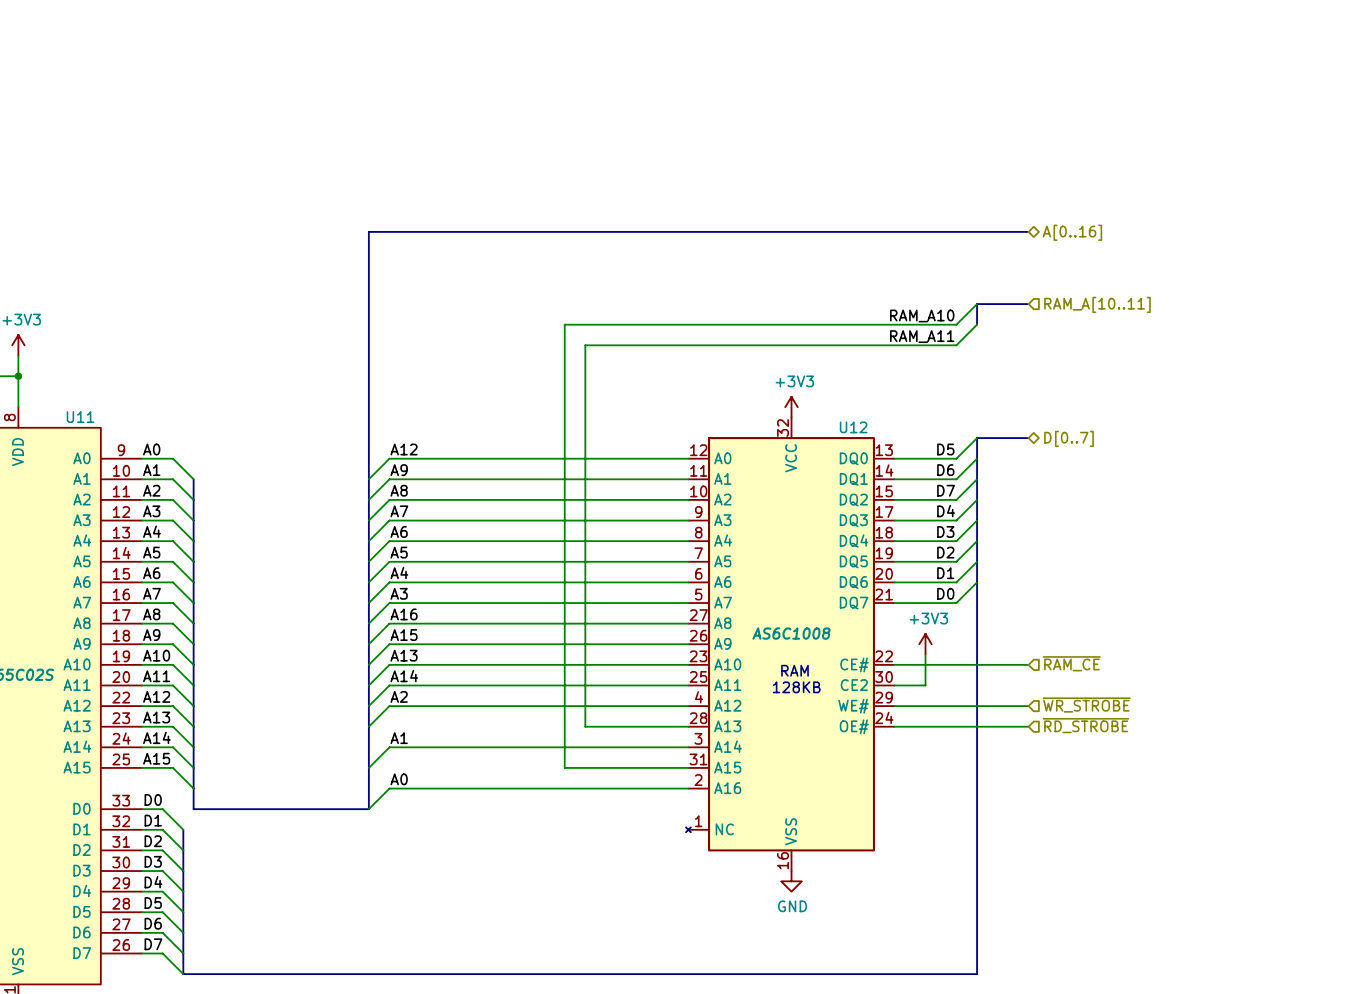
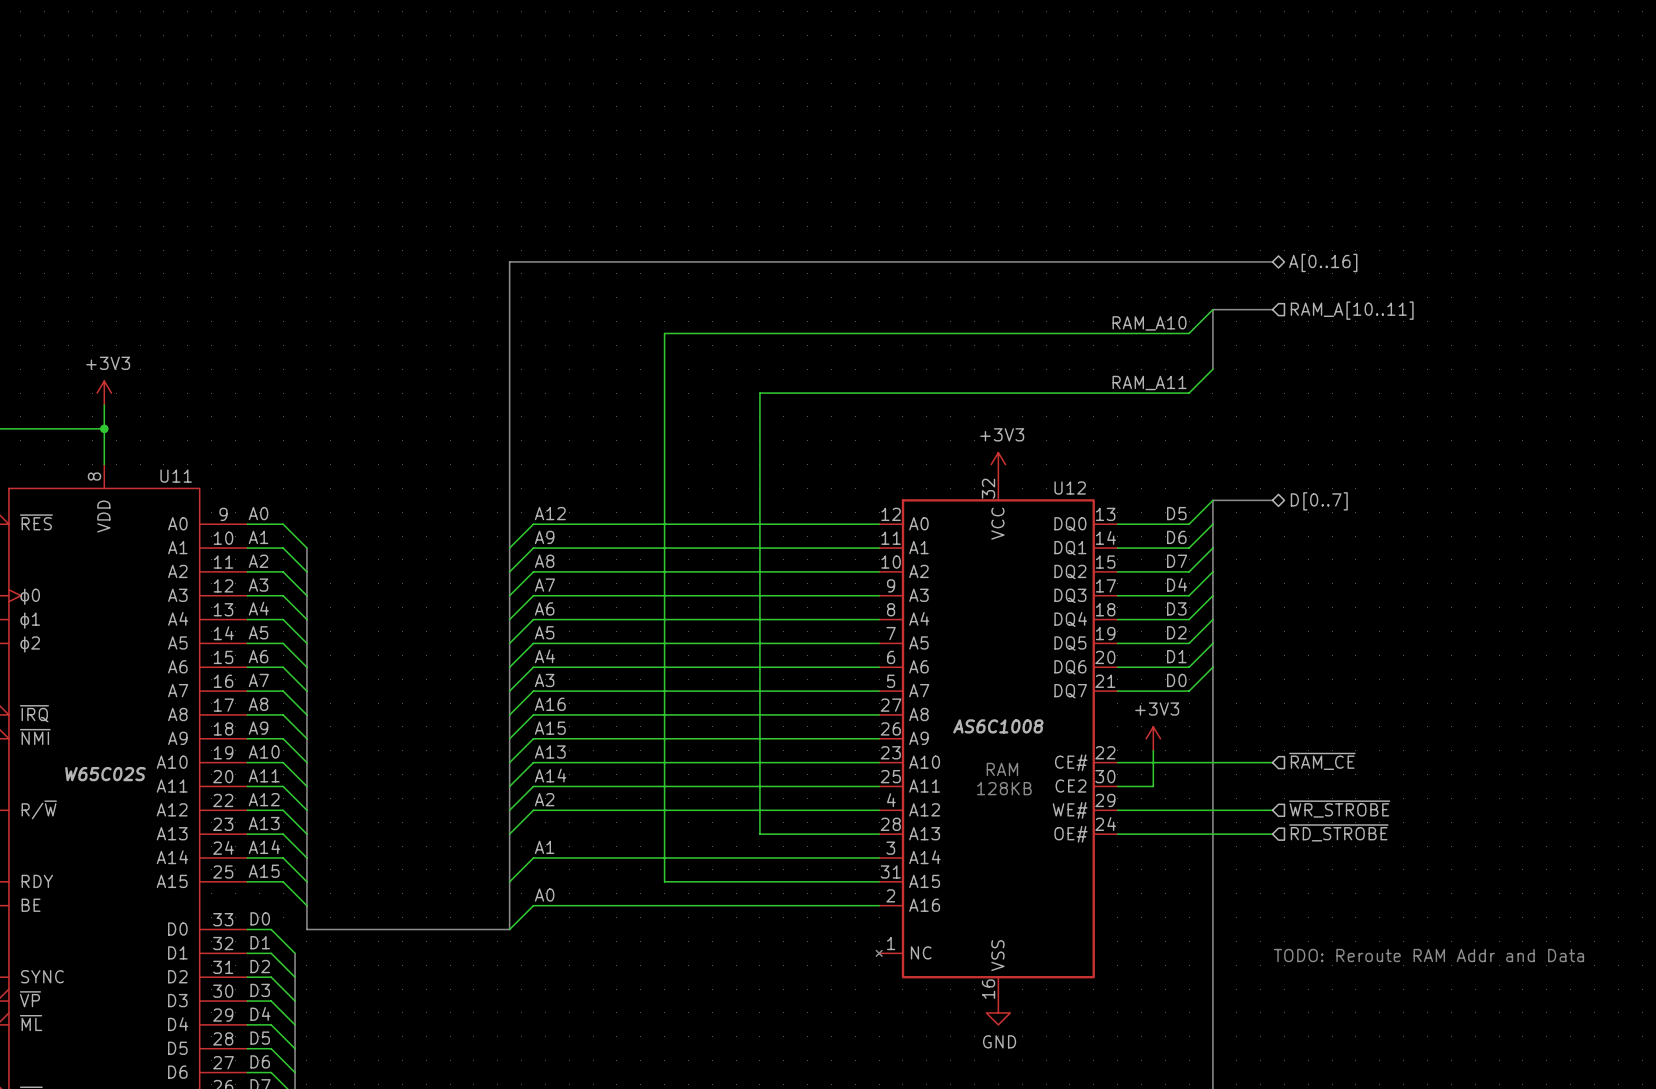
wire: (977, 304) (956, 324) (564, 324) (564, 767) -> (1212, 309) (1189, 333) (664, 333) (664, 881) (736, 881)
bus: (977, 304) (1028, 304) -> (1212, 345) (1212, 309) (1272, 309)
hierarchical label position: RAM_A[10..11] (1097, 304) -> RAM_A[10..11] (1352, 310)
label position: RAM_A10 (922, 315) -> RAM_A10 (1149, 323)
text: none -> TODO: Reroute RAM Addr and Data (1429, 955)

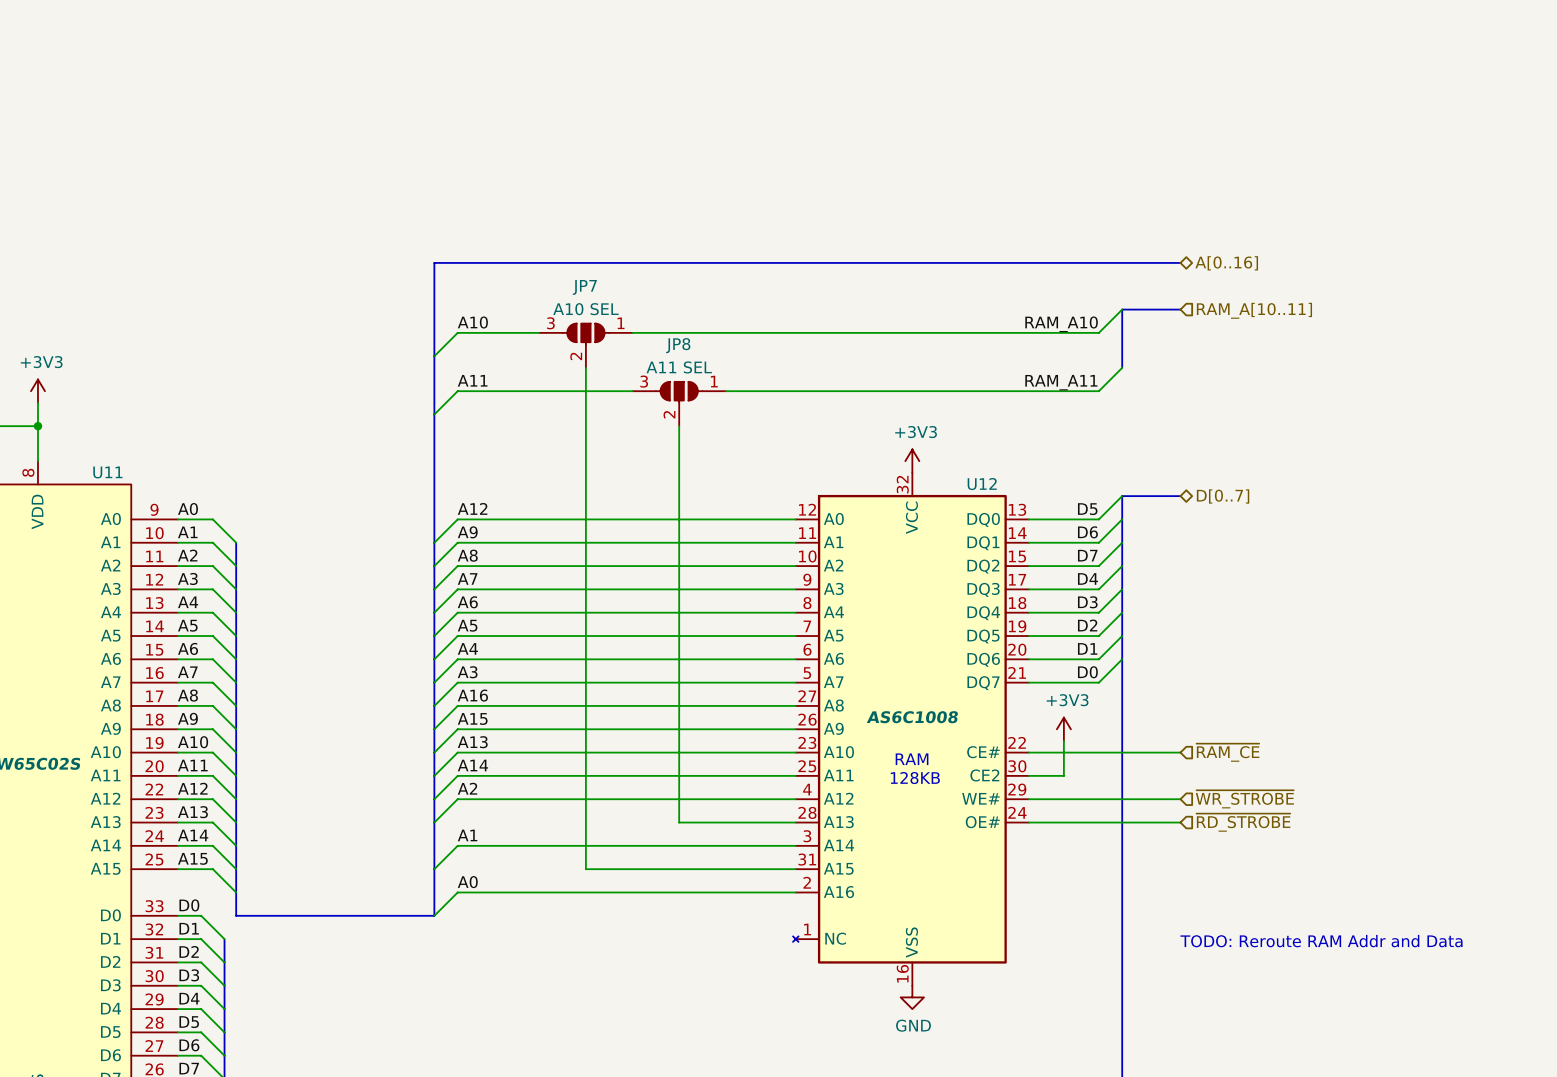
label: none -> A10 (472, 322)
wire: none -> (539, 332) (457, 332) (434, 356)
JP7: none -> A10 SEL (585, 345)
label: none -> A11 (472, 380)
wire: none -> (632, 391) (457, 391) (434, 414)
JP8: none -> A11 SEL (679, 404)

